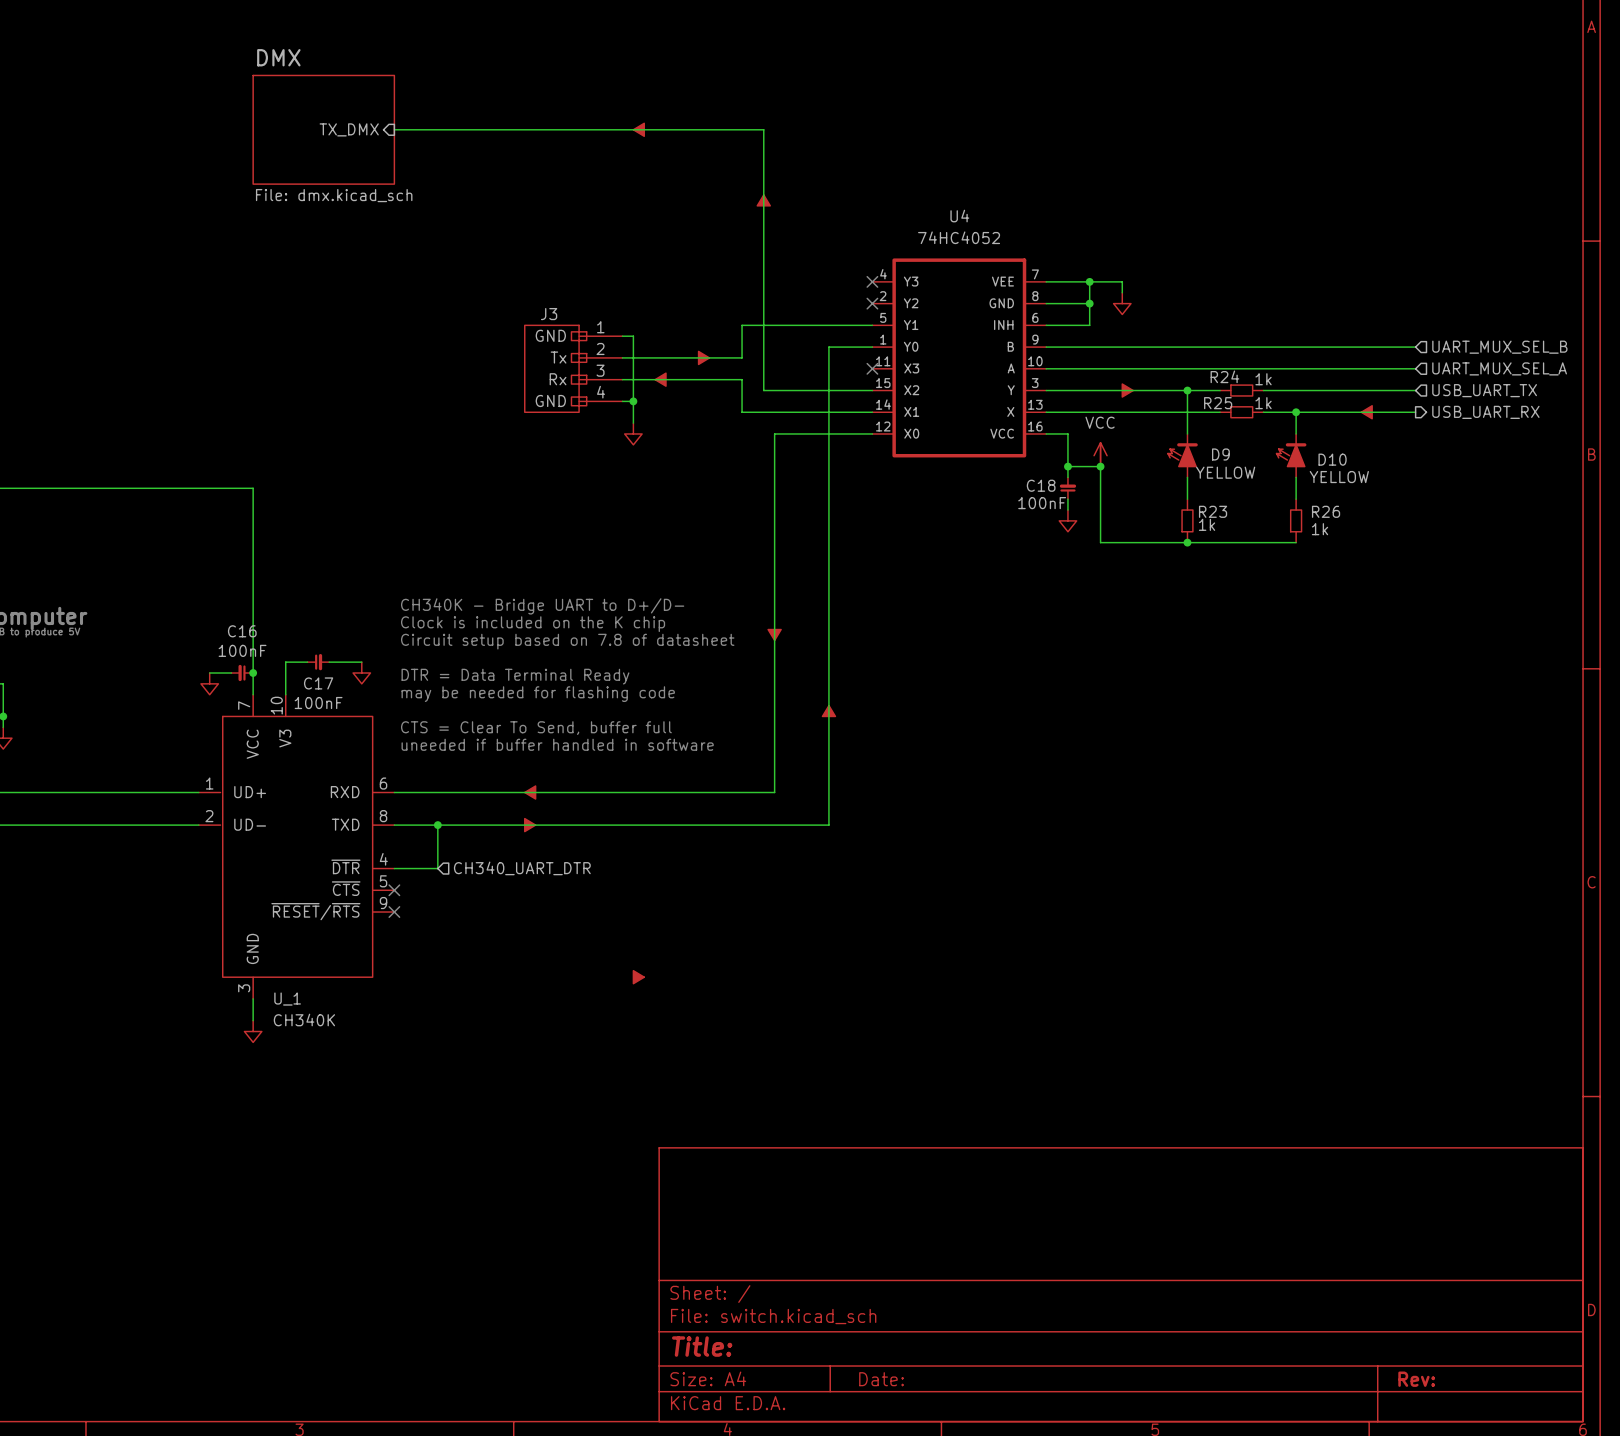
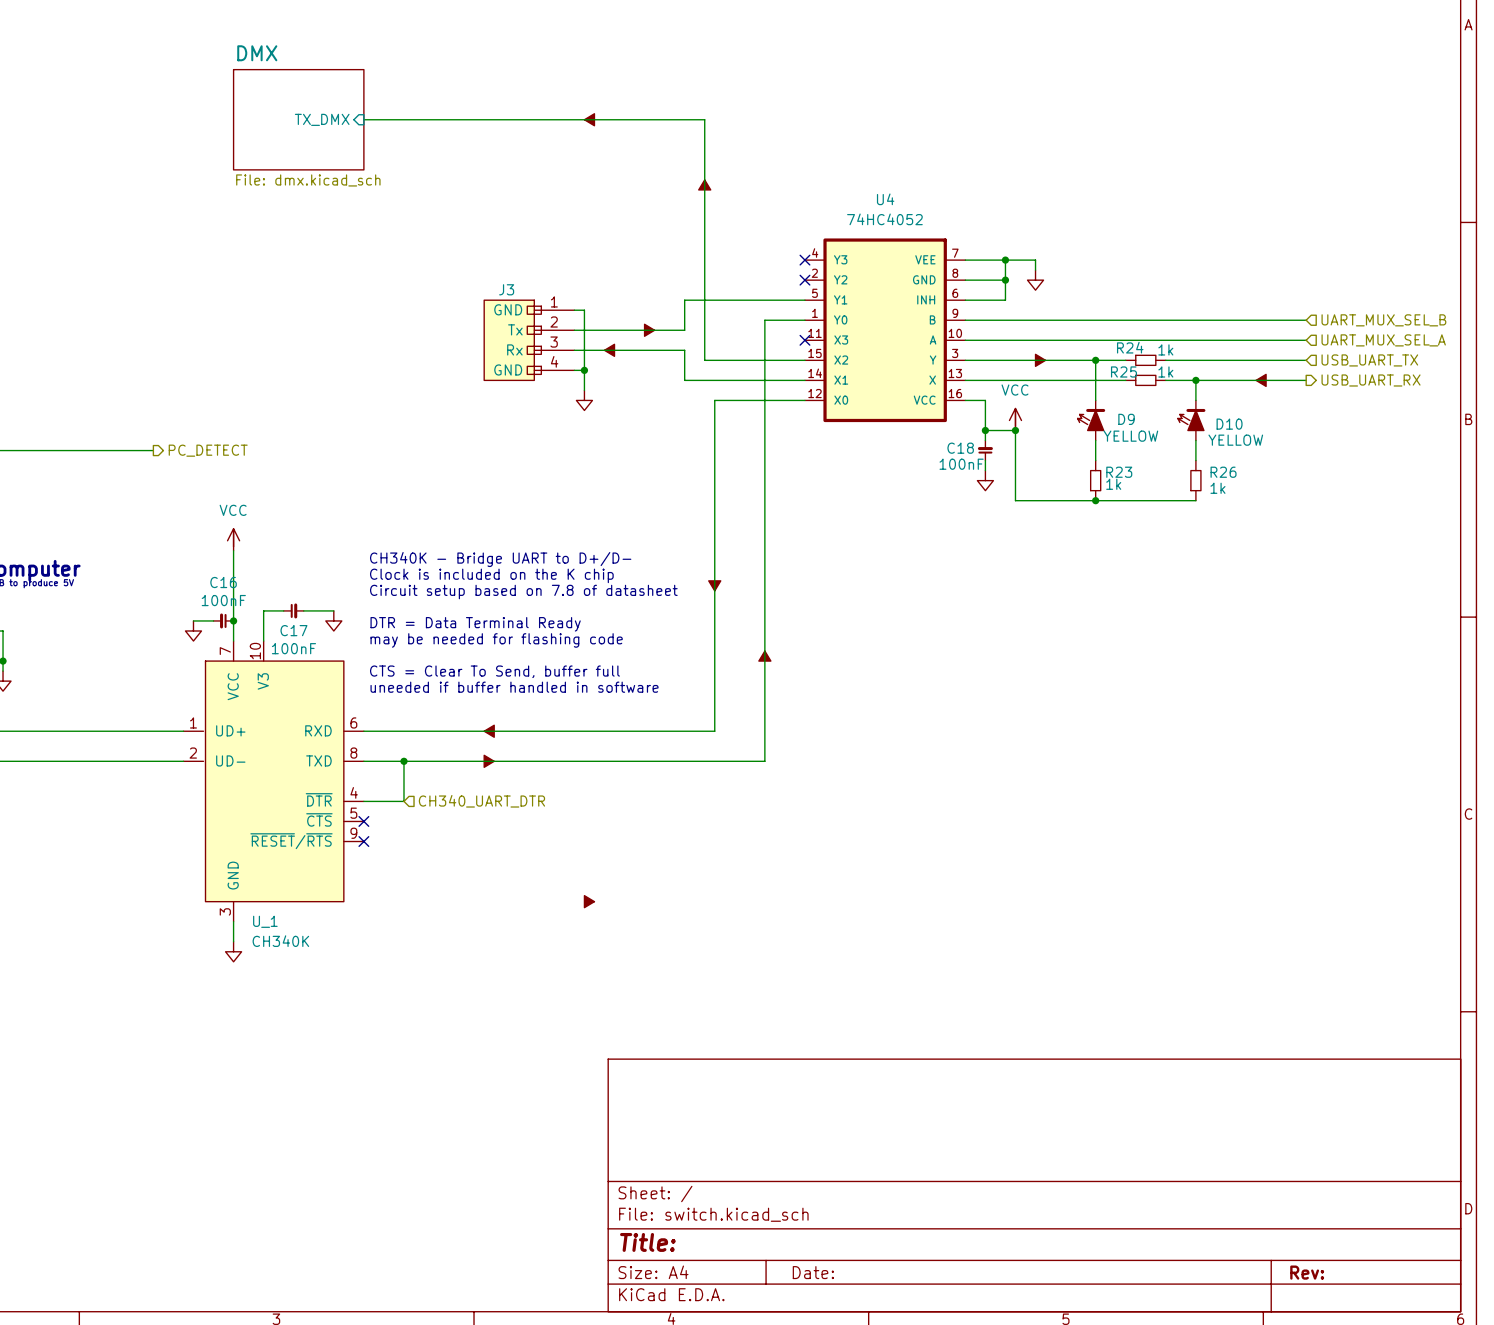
wire: (166, 488) (253, 488) (253, 596) -> none
hierarchical label: none -> PC_DETECT (208, 450)
power symbol: none -> VCC (233, 539)

